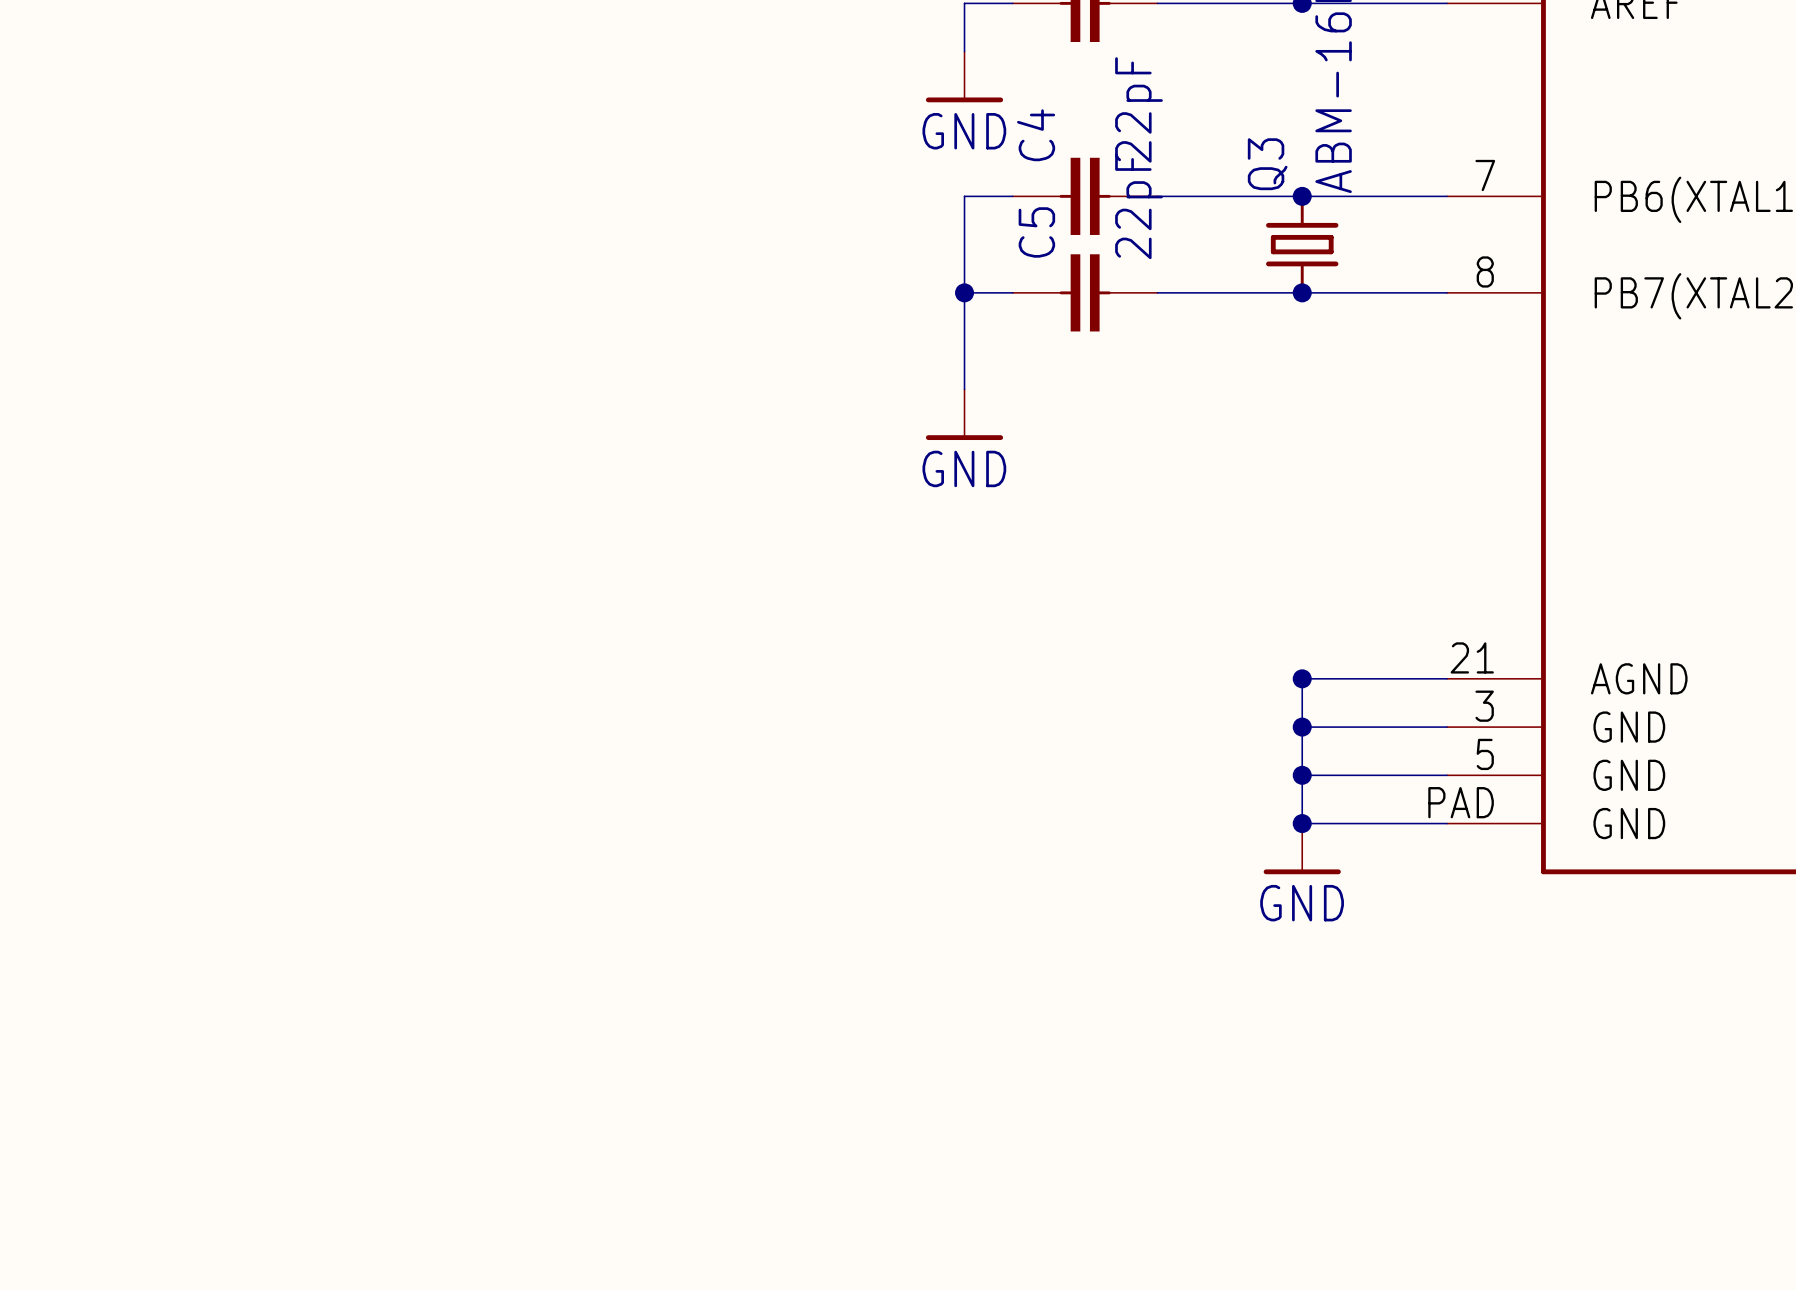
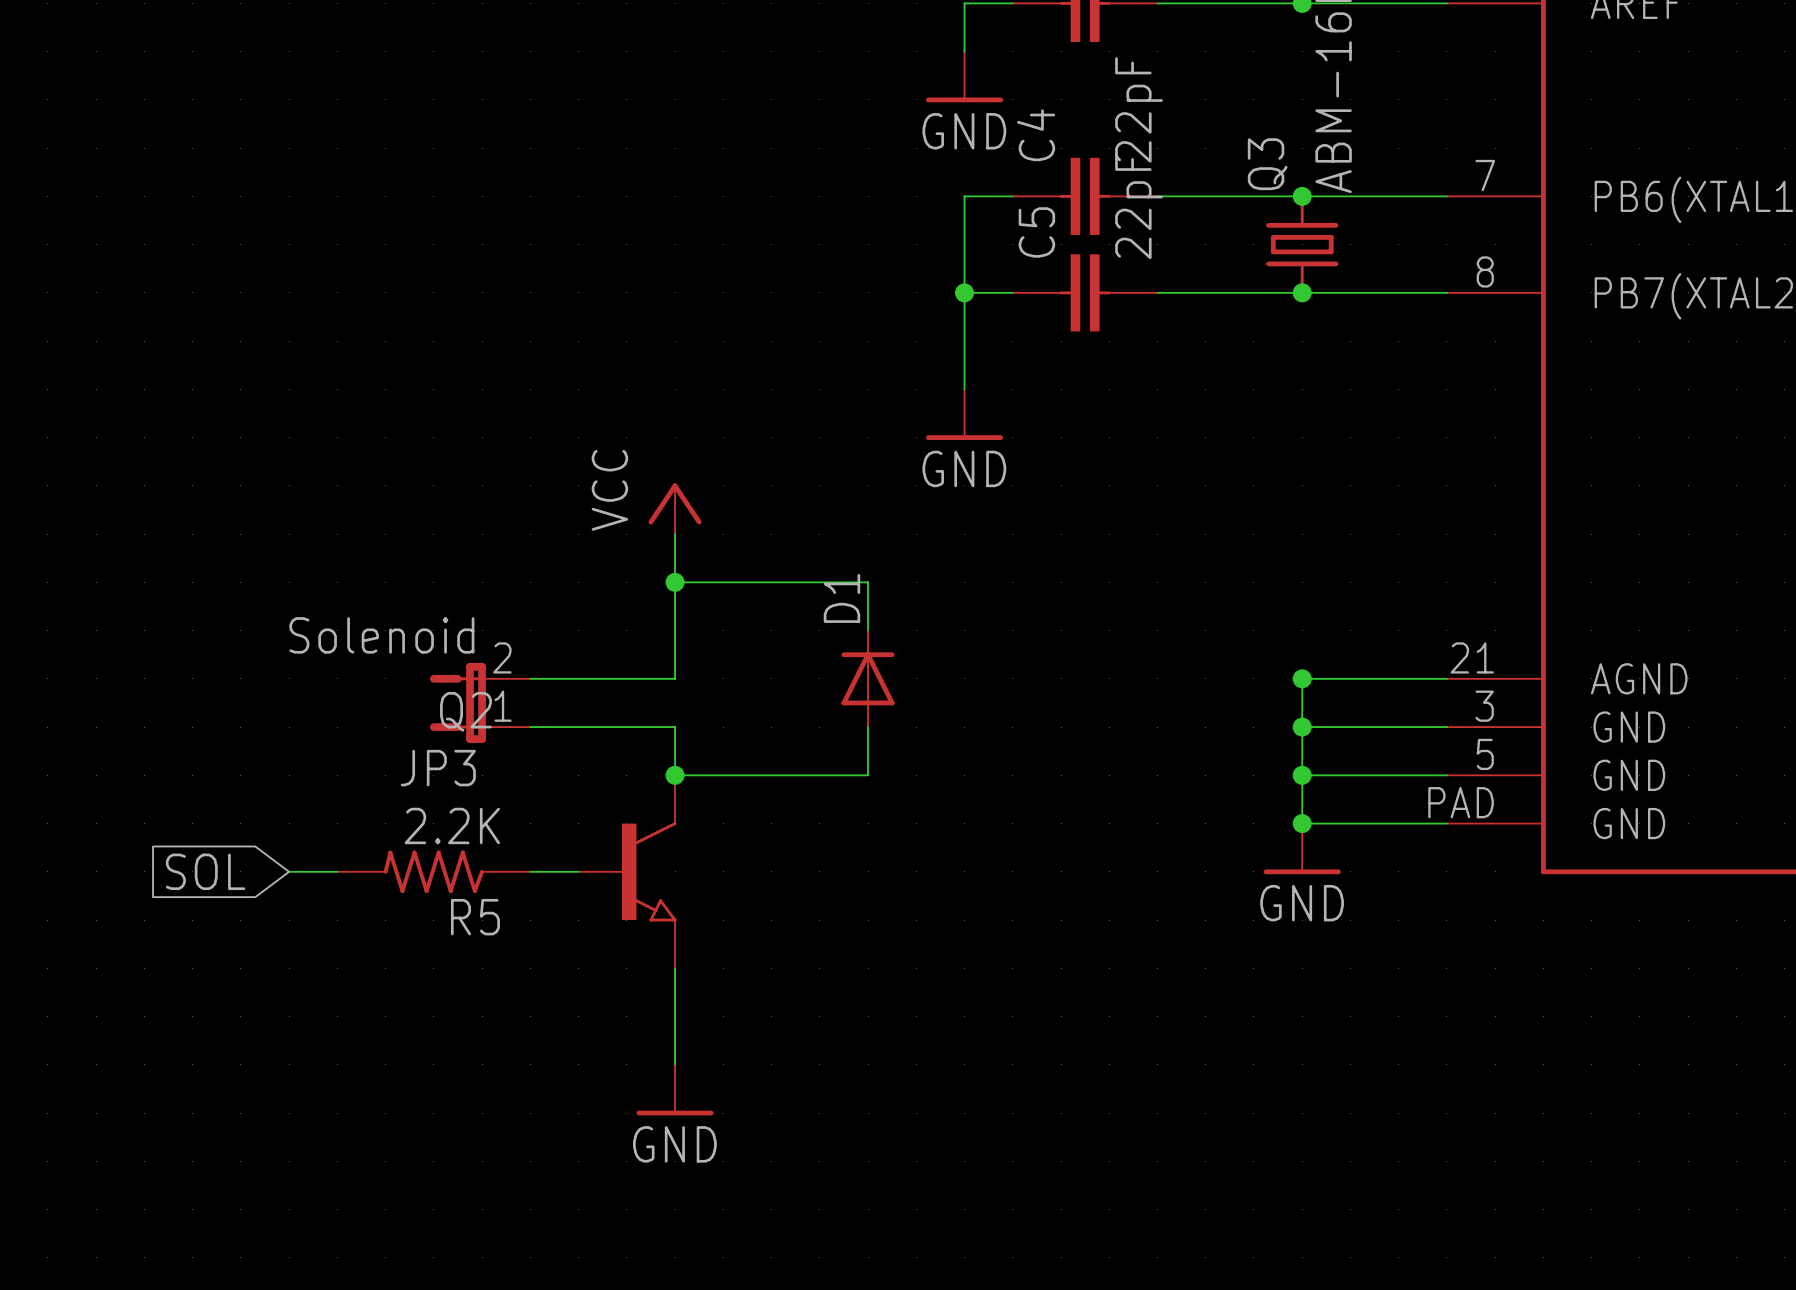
power symbol: none -> VCC (675, 508)
wire: none -> (675, 534) (675, 678) (530, 678)
wire: none -> (675, 582) (868, 582) (868, 630)
junction: none -> (675, 582)
D1: none -> (868, 678)
JP3: none -> Solenoid (480, 702)
wire: none -> (530, 727) (675, 727) (675, 775) (868, 775) (868, 727)
junction: none -> (675, 775)
global label: none -> SOL (205, 871)
wire: none -> (289, 871) (337, 871)
R5: none -> 2.2K (433, 871)
wire: none -> (530, 871) (578, 871)
Q2: none -> (627, 871)
wire: none -> (675, 968) (675, 1064)
power symbol: none -> GND (675, 1090)

